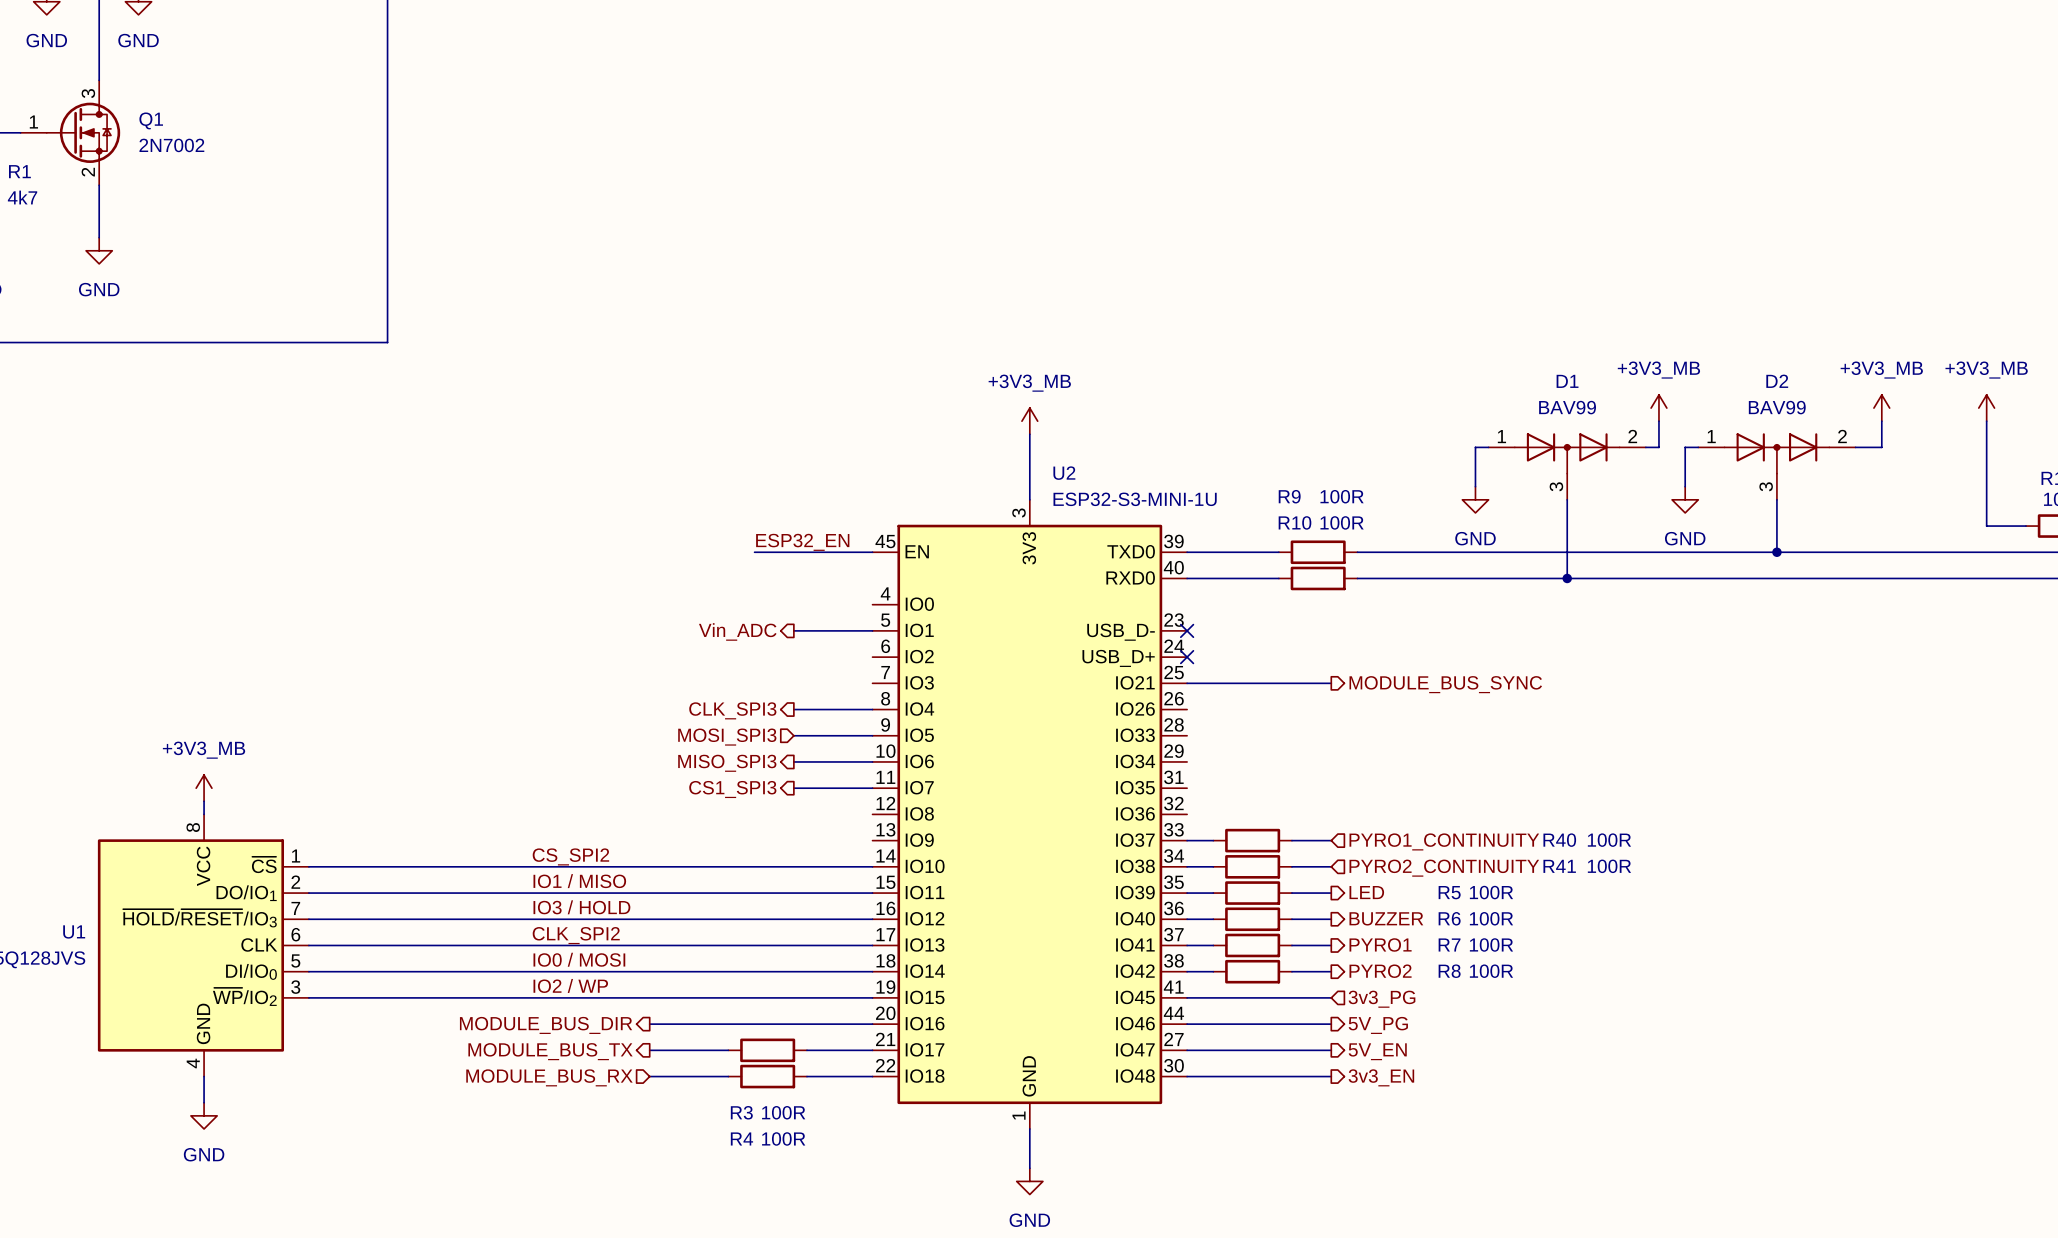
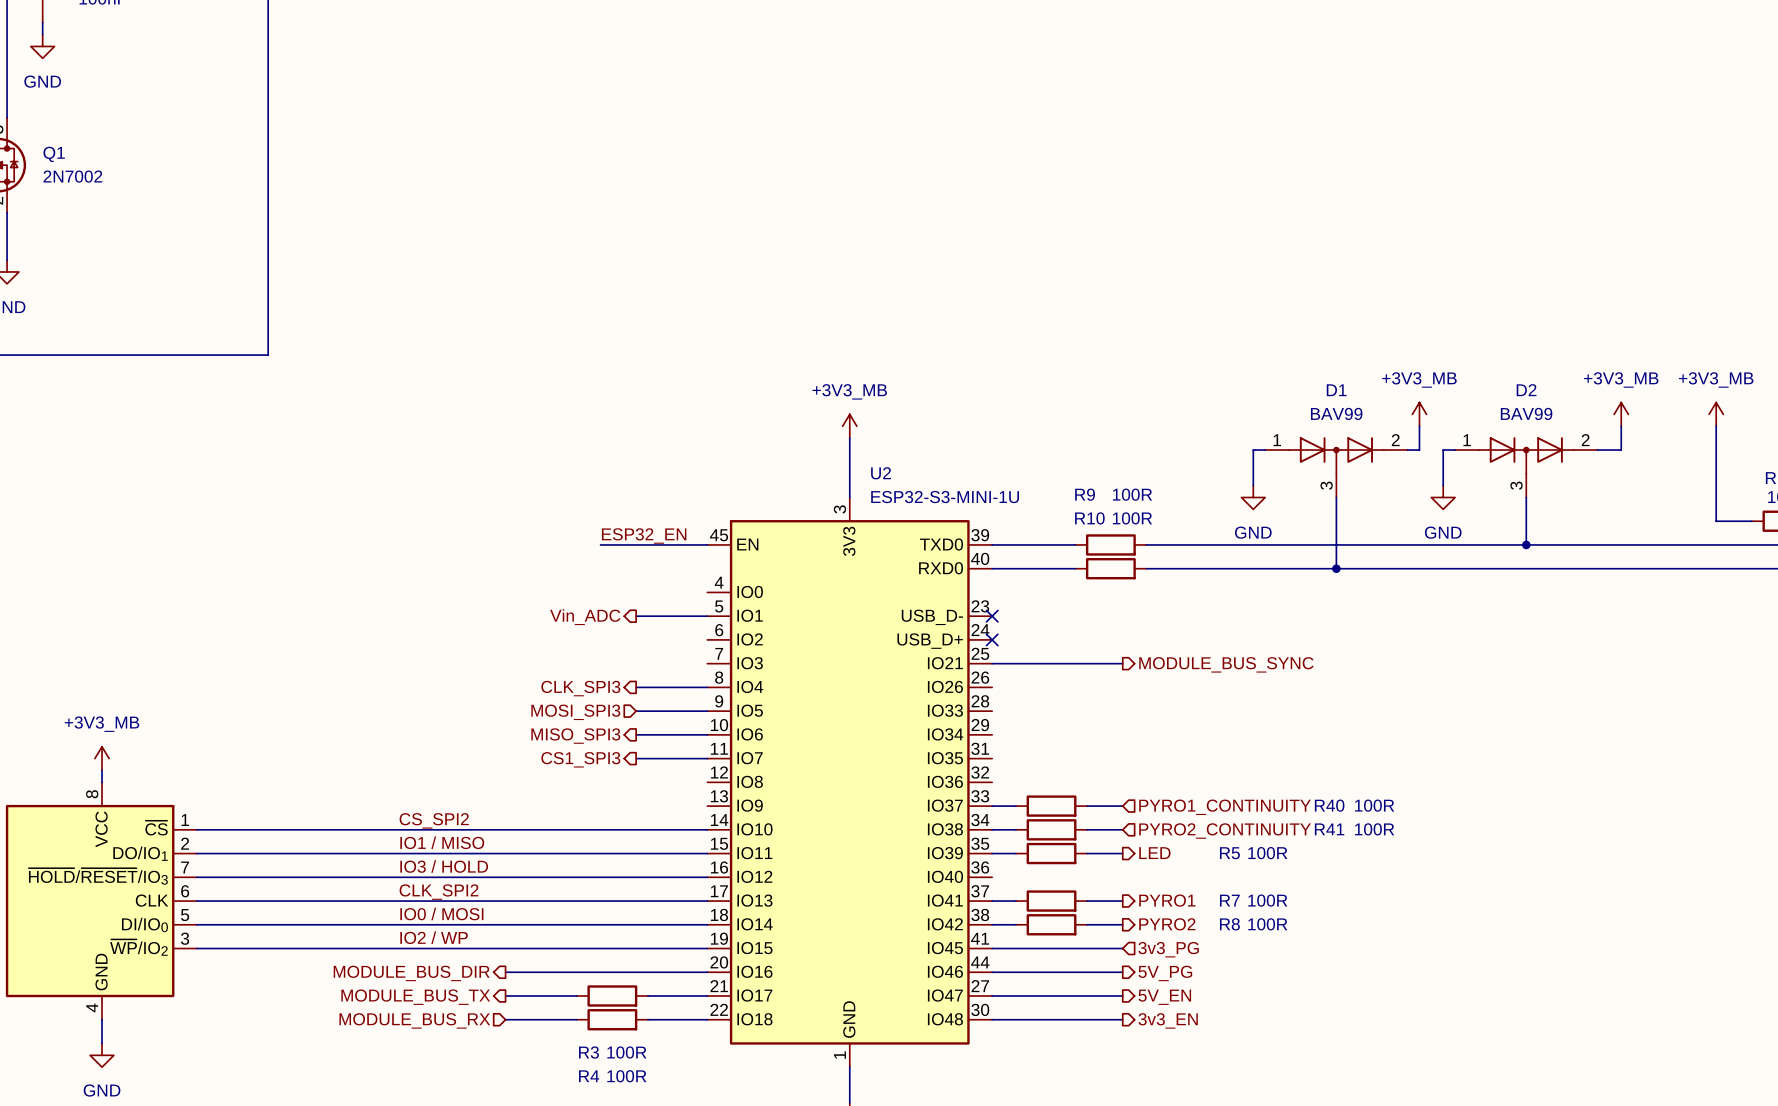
hierarchical label: BUZZER (1386, 918) -> none
wire: (1187, 919) (1213, 919) -> none
R6: 100R (1252, 919) -> none
wire: (1291, 919) (1331, 919) -> none

